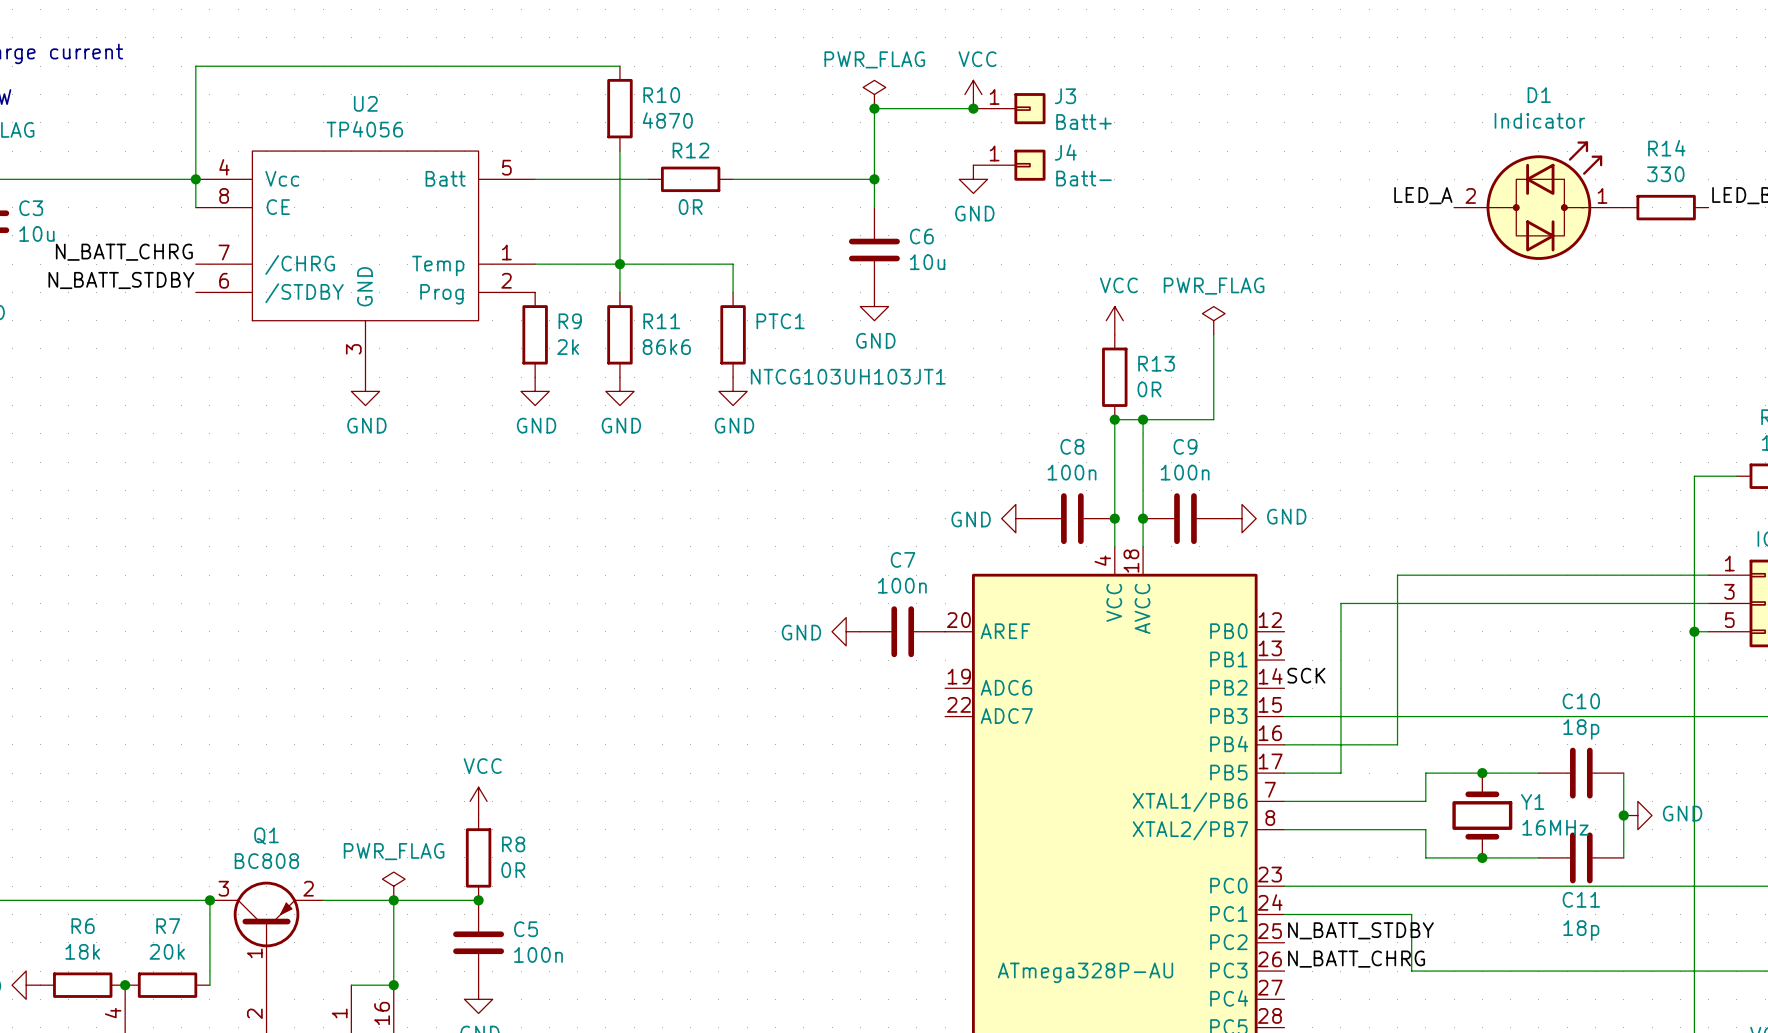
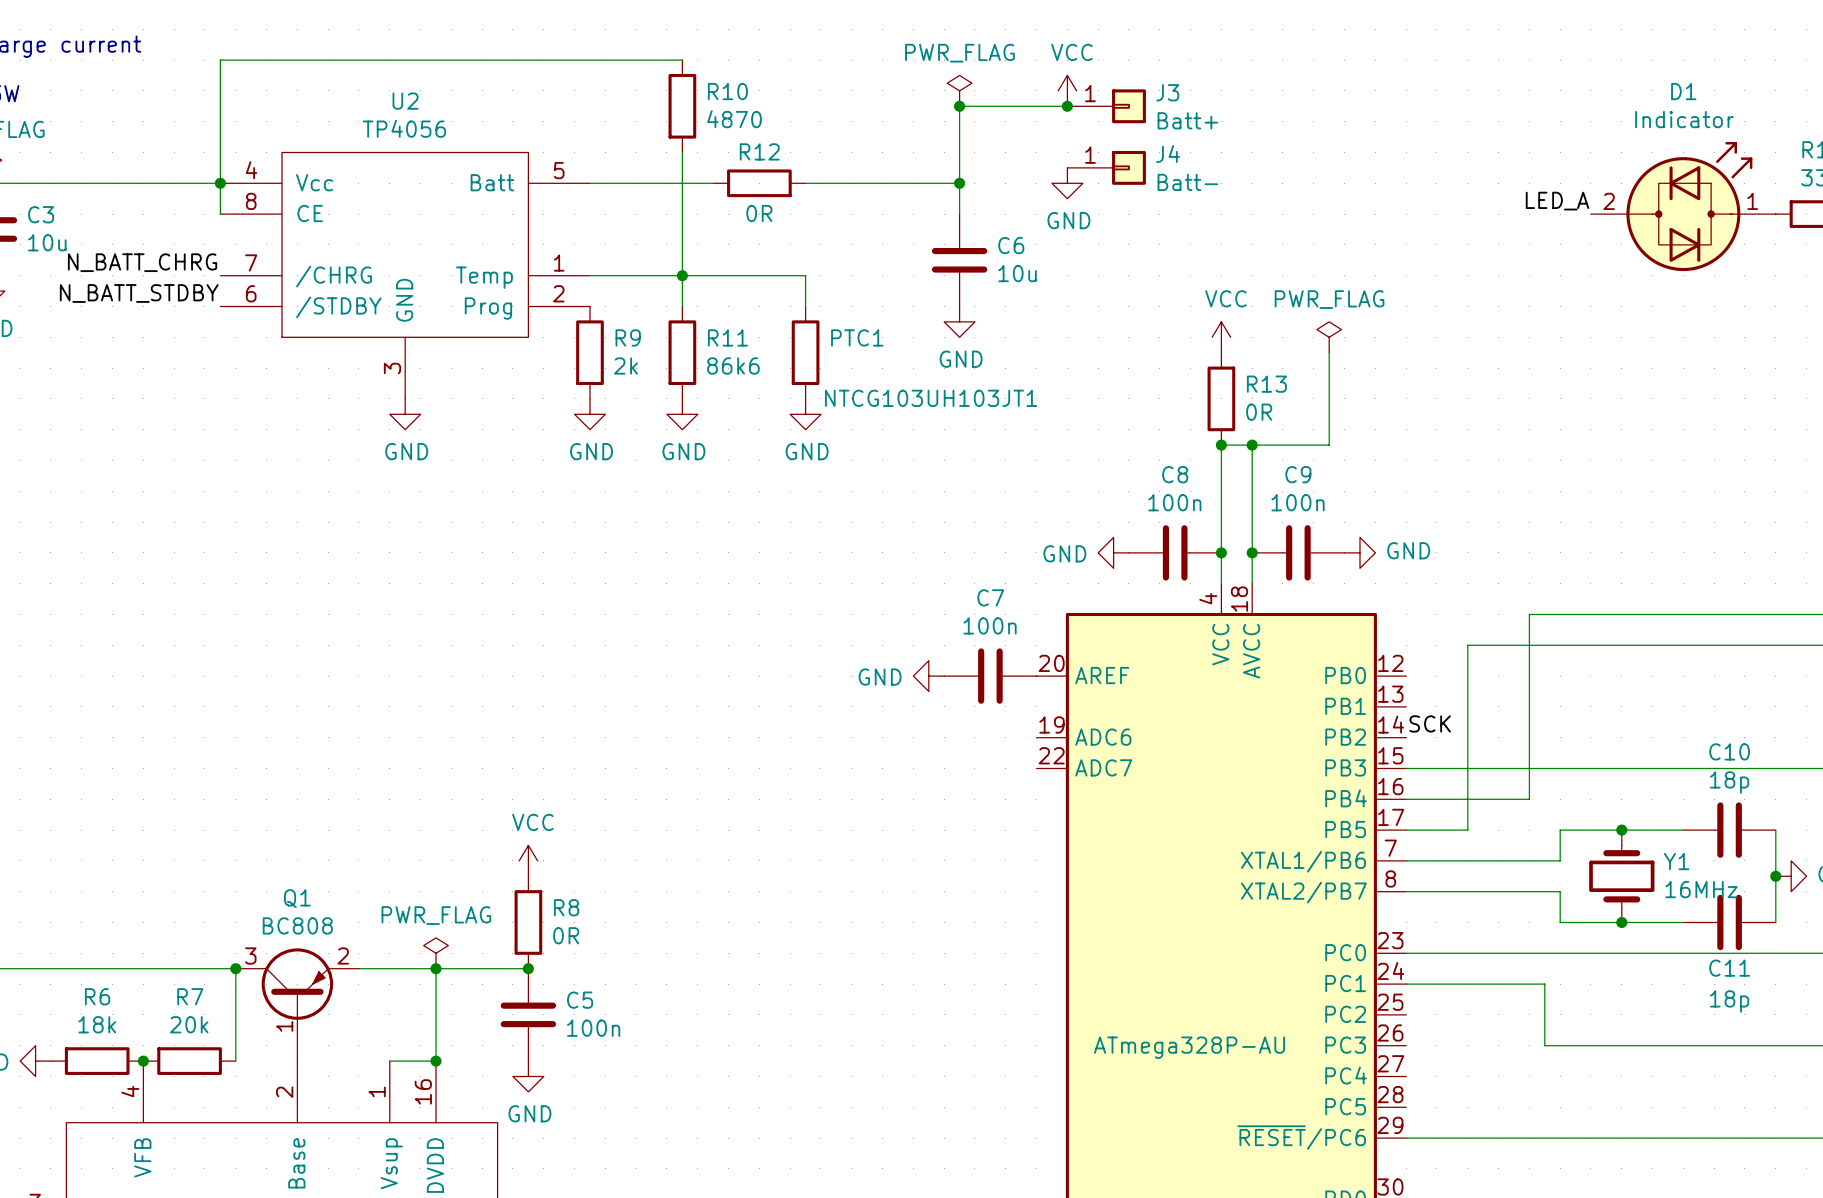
label: N_BATT_STDBY (1360, 930) -> none
label: N_BATT_CHRG (1356, 959) -> none

